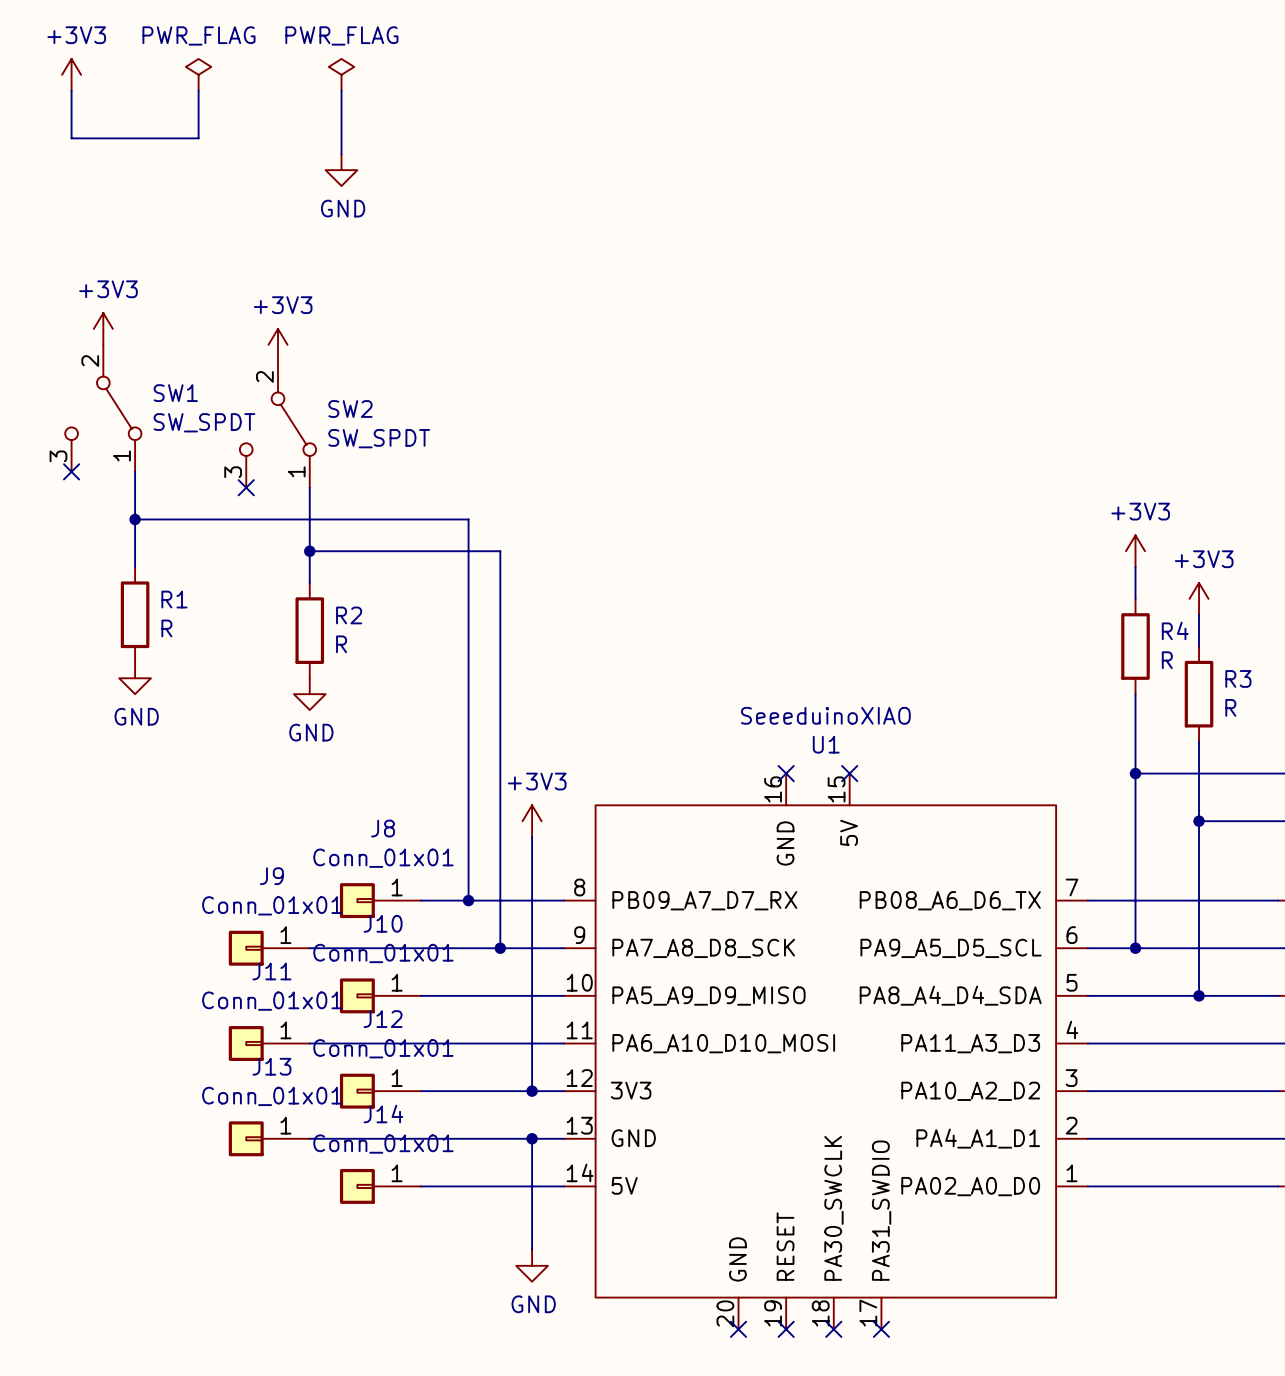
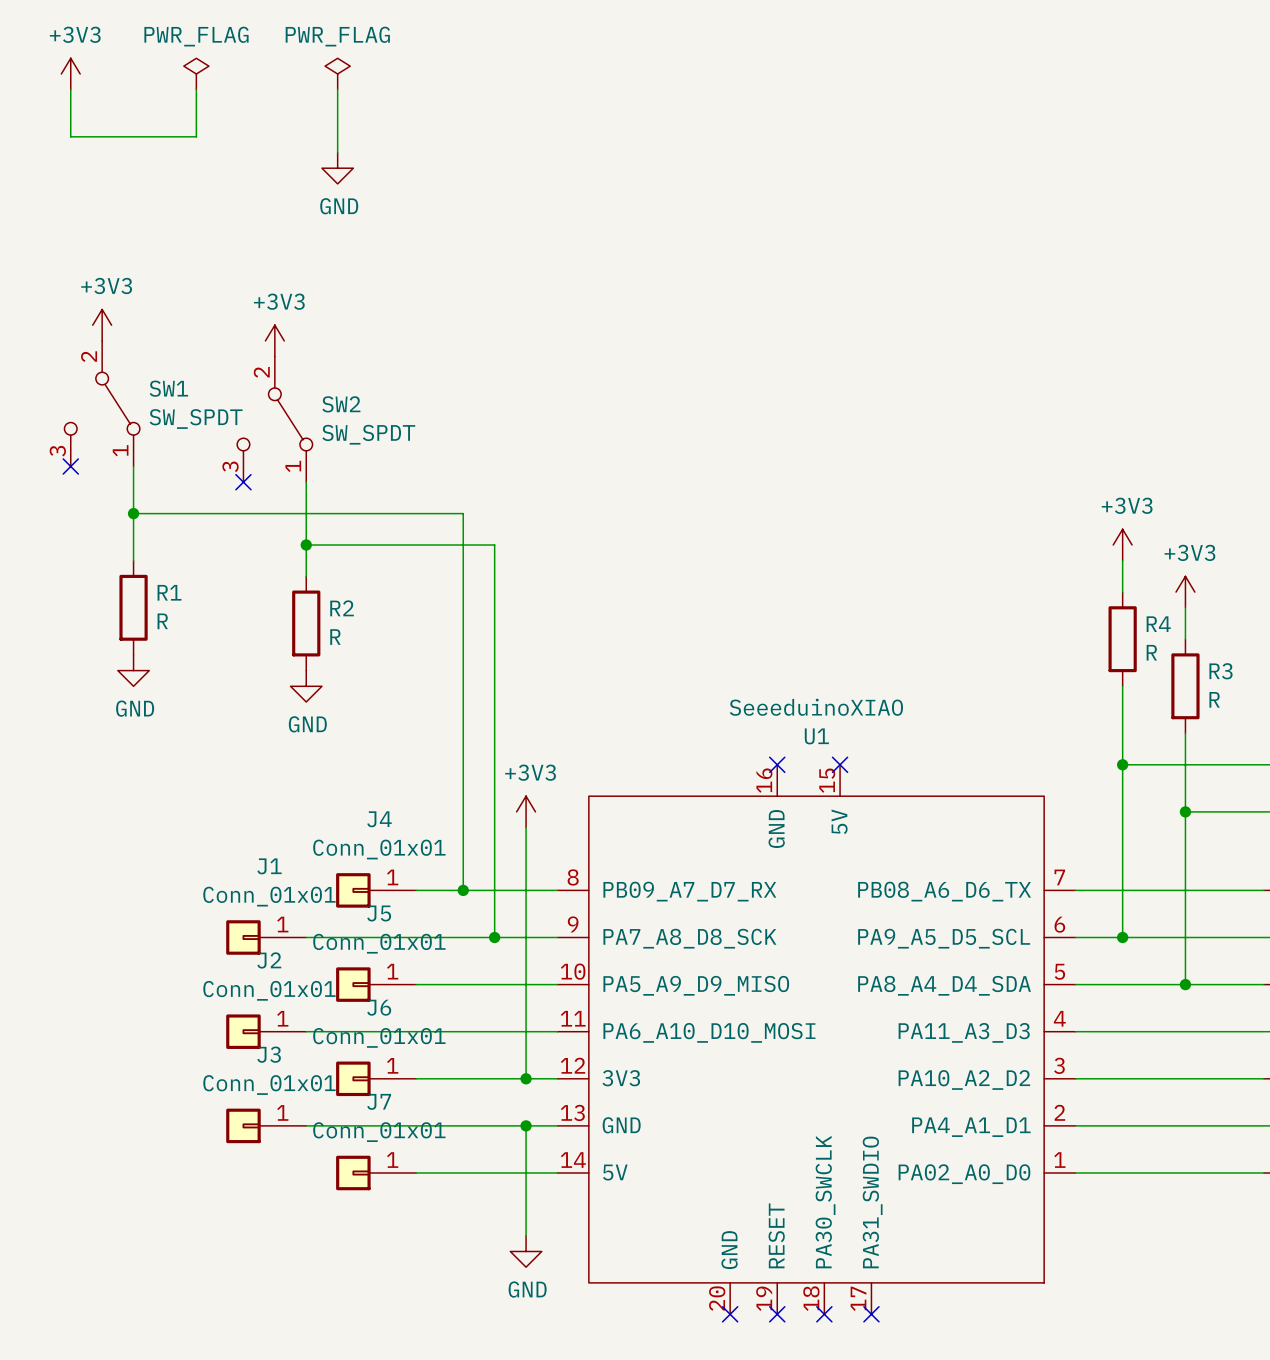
J8 name: J8 (383, 828) -> J4 (379, 819)
J9 name: J9 (271, 876) -> J1 (269, 866)
J10 name: J10 (383, 923) -> J5 (379, 913)
J11 name: J11 (271, 971) -> J2 (269, 960)
J12 name: J12 (383, 1019) -> J6 (379, 1007)
J13 name: J13 (271, 1066) -> J3 (269, 1054)
J14 name: J14 (383, 1114) -> J7 (379, 1101)

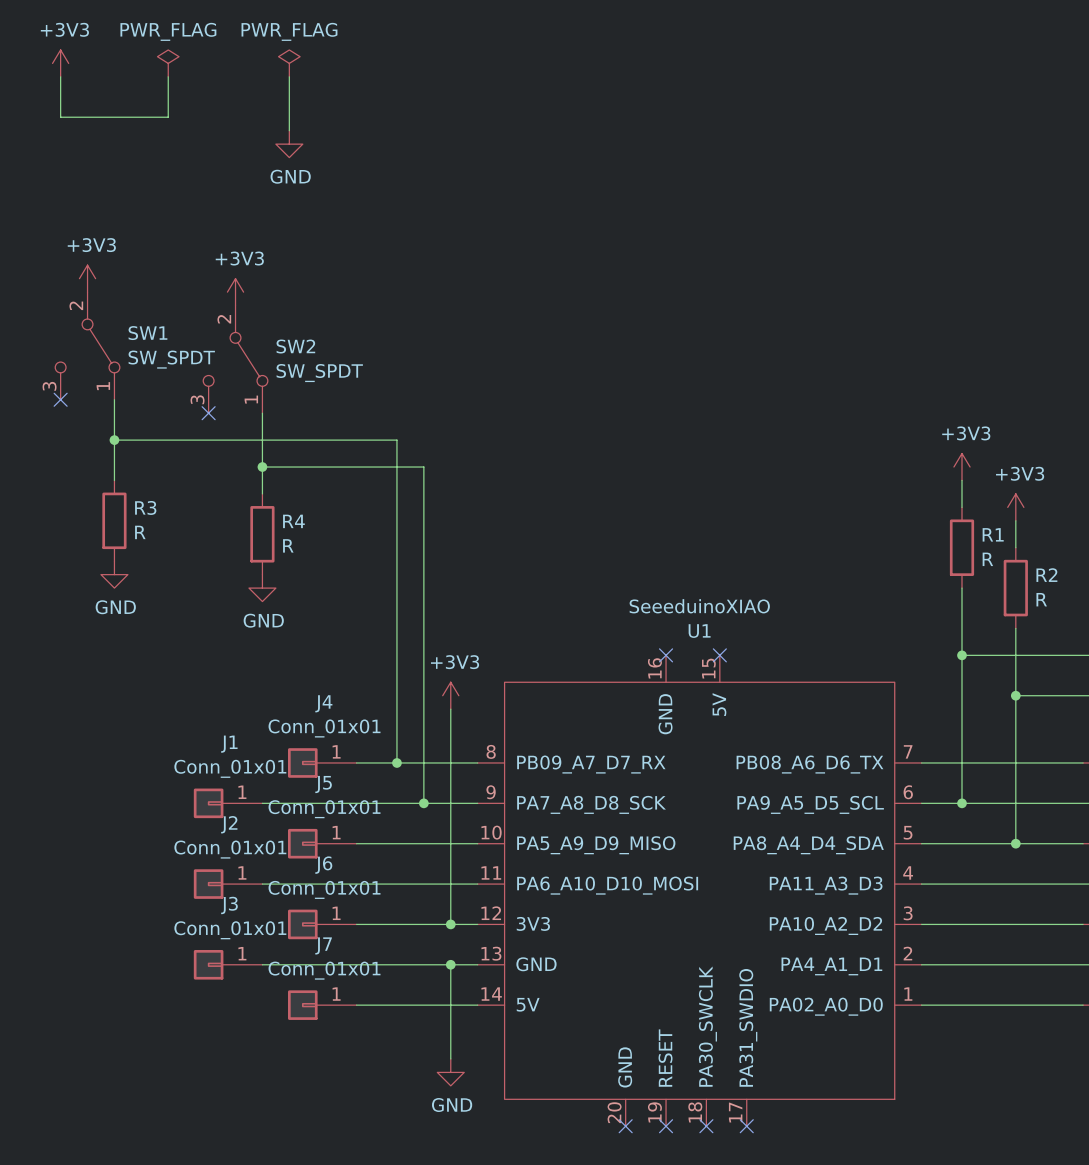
R1 name: R1 (169, 592) -> R3 (145, 507)
R2 name: R2 (342, 608) -> R4 (293, 521)
R4 name: R4 (1158, 624) -> R1 (993, 534)
R3 name: R3 (1221, 671) -> R2 (1046, 575)

